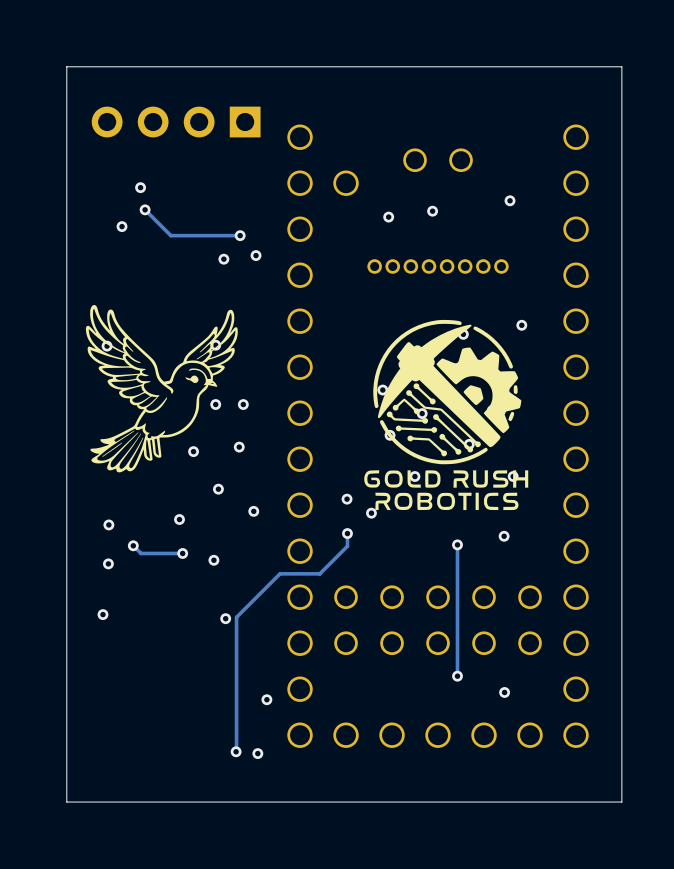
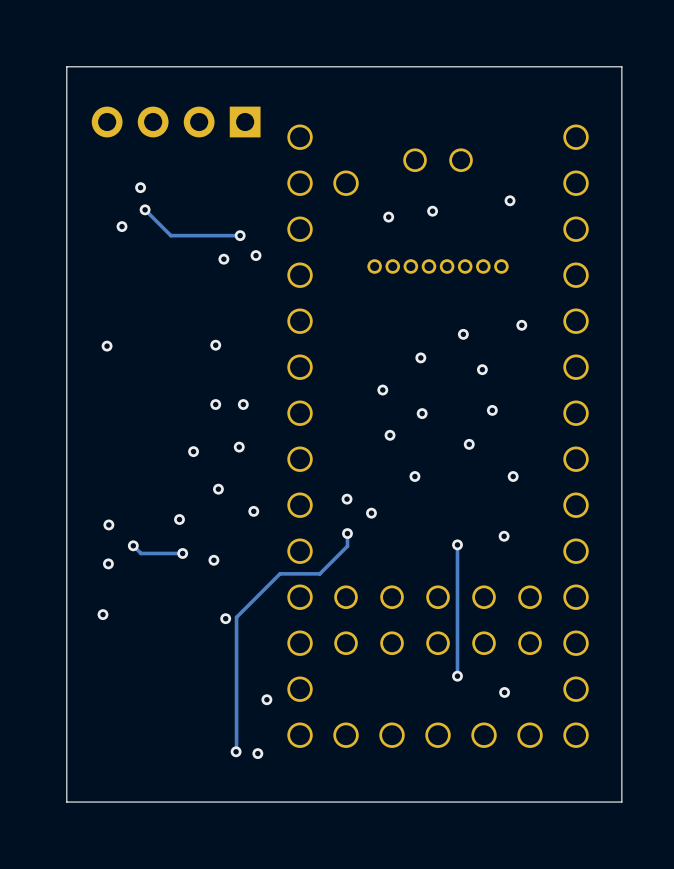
drawing: [85, 304, 238, 473] -> none
drawing: [364, 319, 529, 511] -> none

